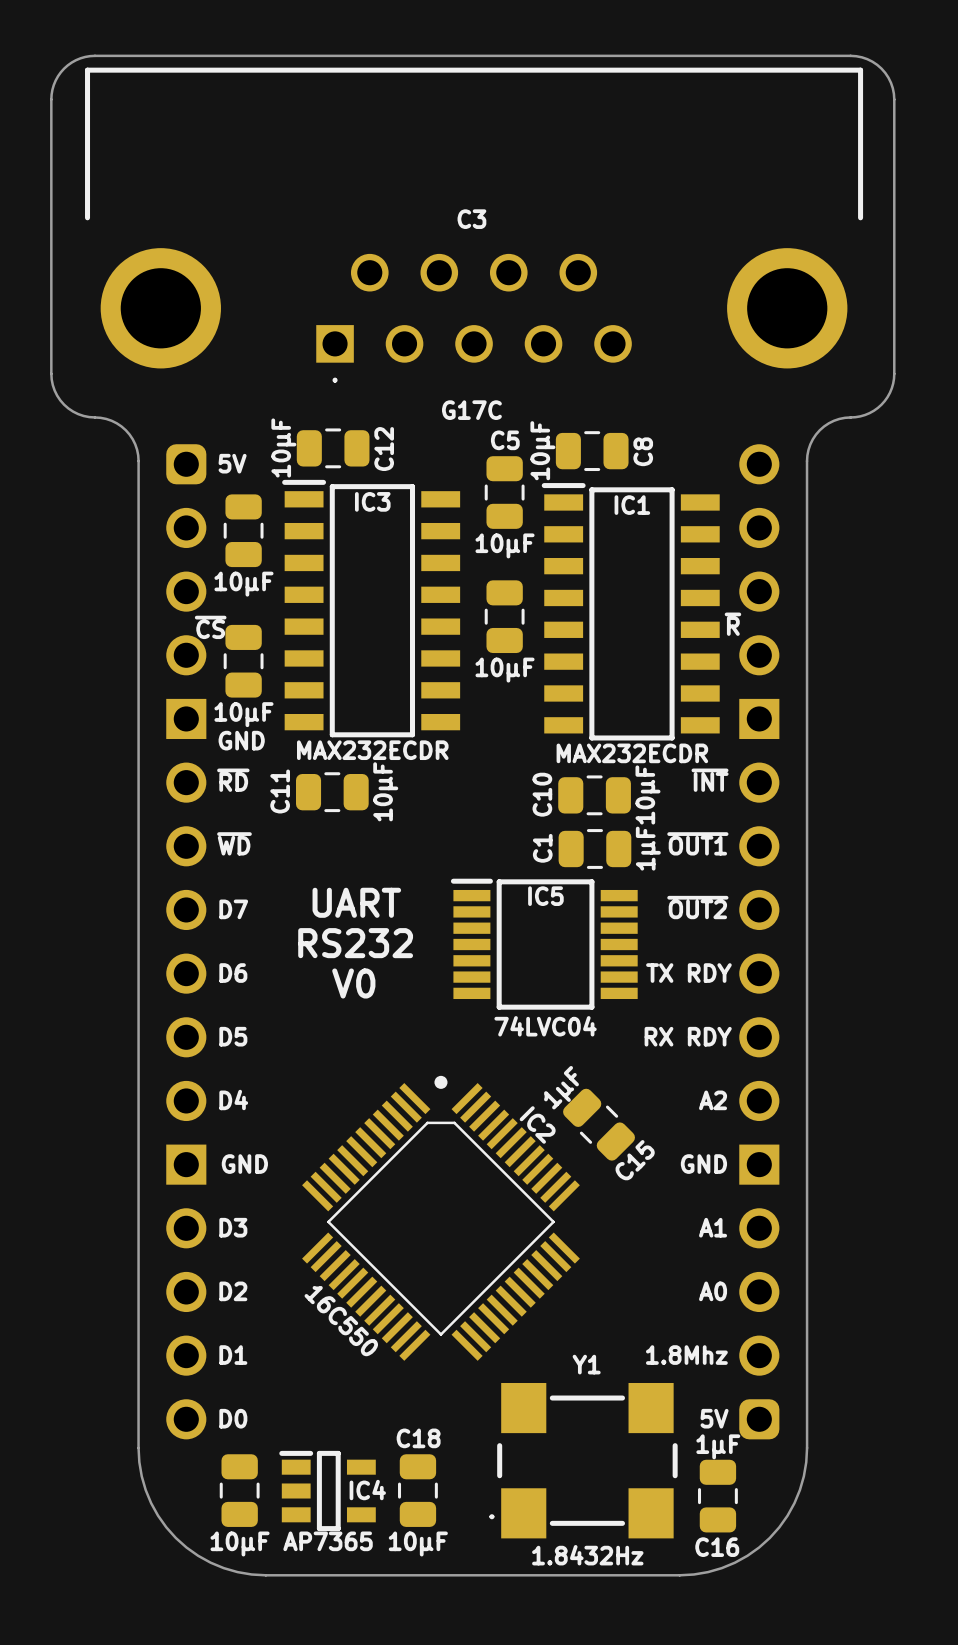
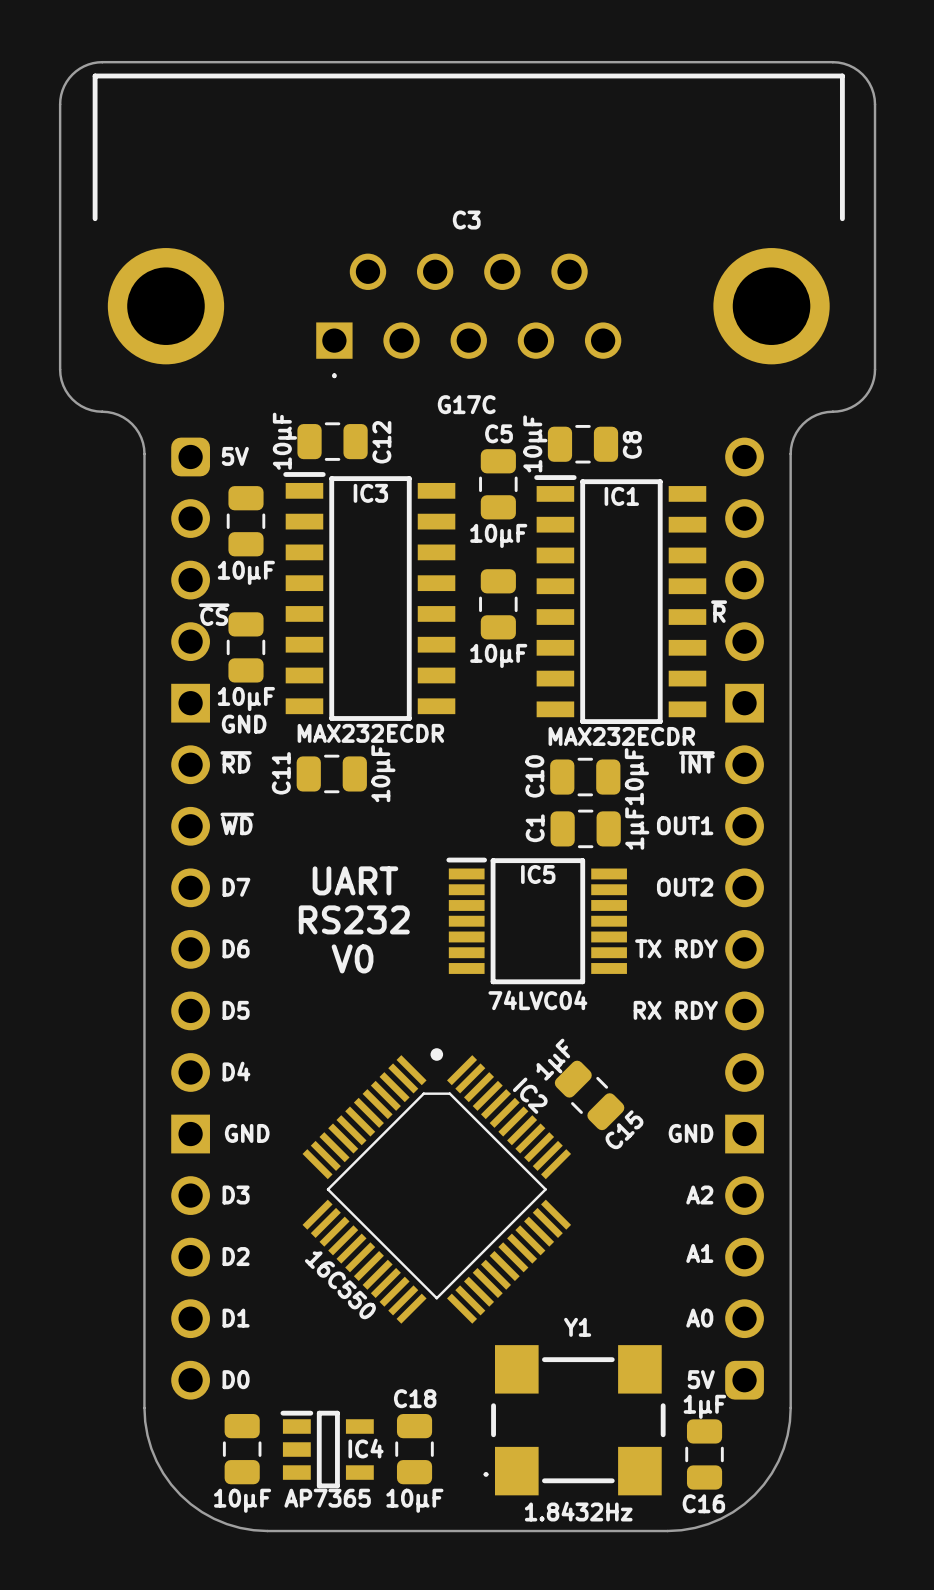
text: ~{OUT1} (697, 843) -> OUT1 (685, 825)
text: ~{OUT2} (697, 907) -> OUT2 (685, 887)
text: A2 (713, 1100) -> none
text: A1 (713, 1227) -> A2 (699, 1195)
text: A0 (713, 1291) -> A1 (699, 1253)
text: 1.8Mhz (686, 1355) -> A0 (699, 1318)

